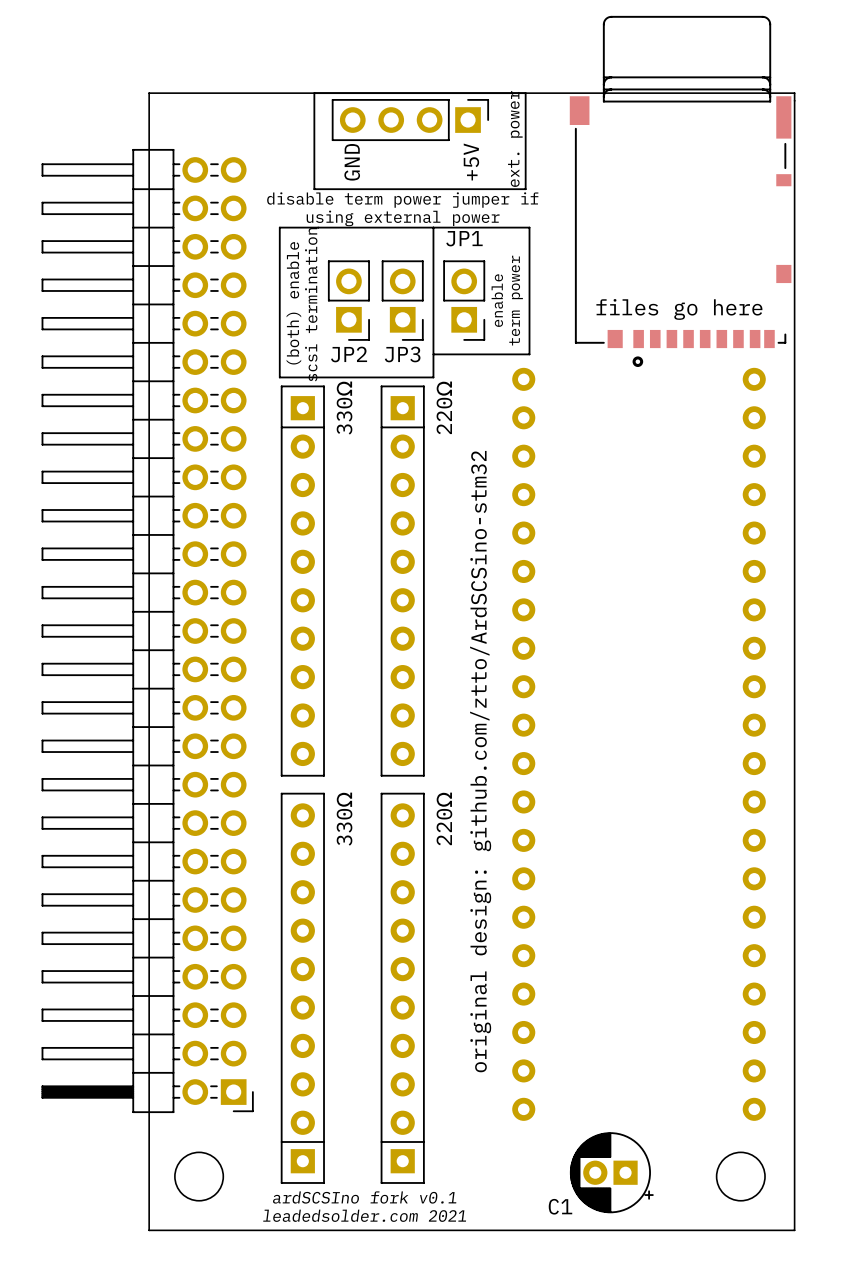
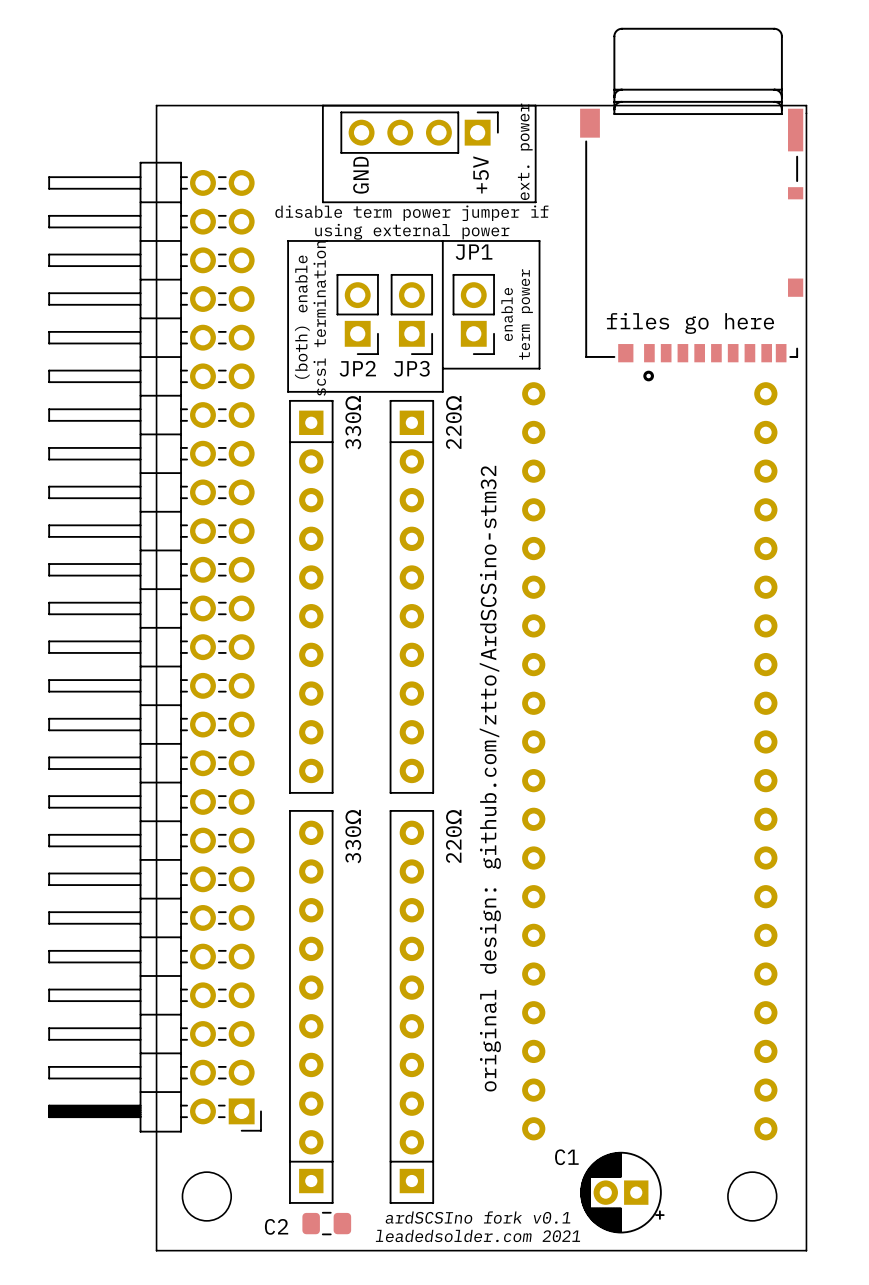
text position: ardSCSIno fork v0.1 (364, 1197) -> ardSCSIno fork v0.1 (477, 1217)
C2: none -> (326, 1223)
C1 name position: C1 (560, 1206) -> C1 (566, 1157)
text position: leadedsolder.com 2021 (364, 1215) -> leadedsolder.com 2021 (477, 1235)

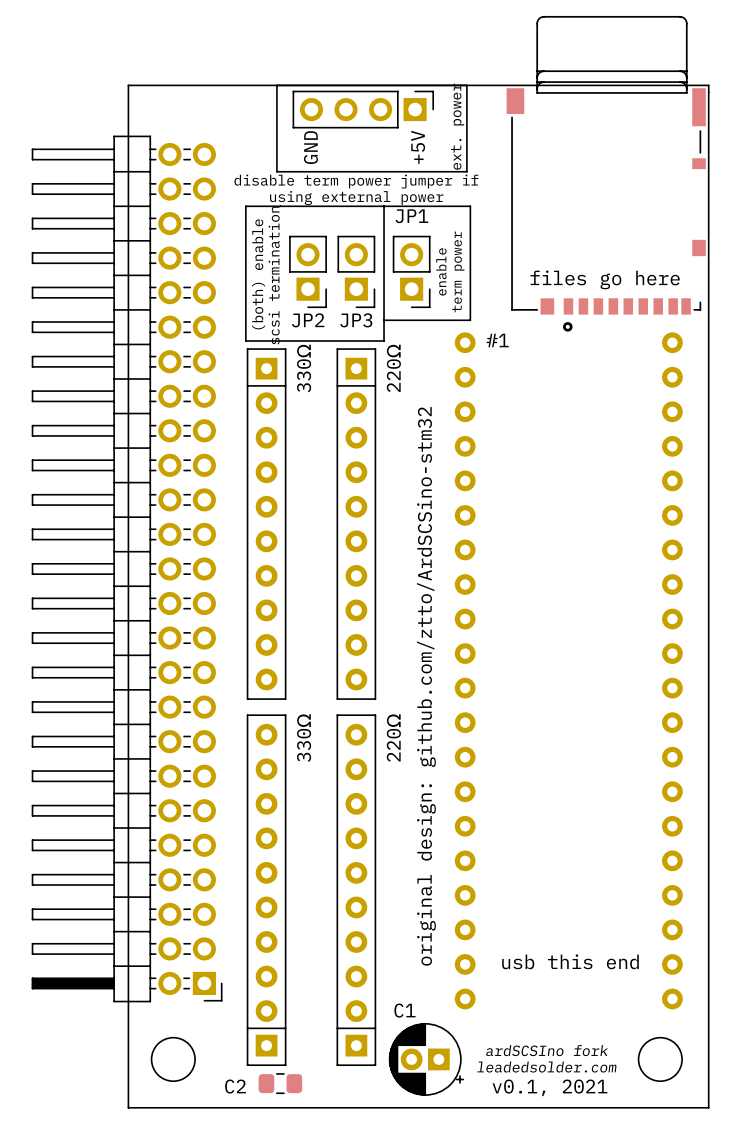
text: none -> #1 (497, 340)
text: none -> usb this end (570, 961)
C1 name position: C1 (566, 1157) -> C1 (404, 1010)
text: none -> ardSCSIno fork (547, 1050)
C1 position: (622, 1192) -> (426, 1059)
text: none -> leadedsolder.com (546, 1067)
text: ardSCSIno fork v0.1 (477, 1217) -> none
text: none -> v0.1, 2021 (549, 1087)
text: leadedsolder.com 2021 (477, 1235) -> none

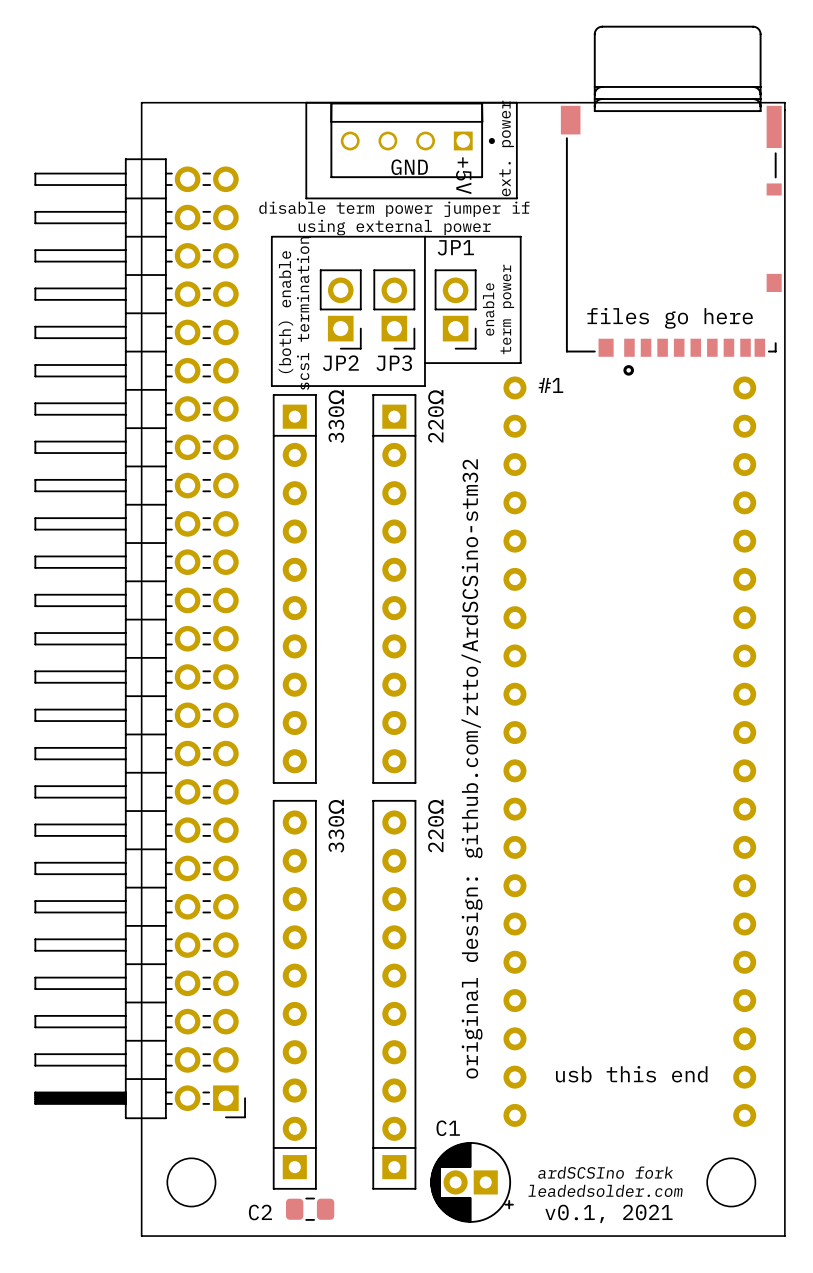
part: (363, 109) -> none
part: none -> (412, 140)
text rotation: 0° (310, 147) -> 90° clockwise (409, 167)
text position: GND (310, 147) -> GND (409, 167)
text rotation: 0° (418, 147) -> 180° (463, 175)

